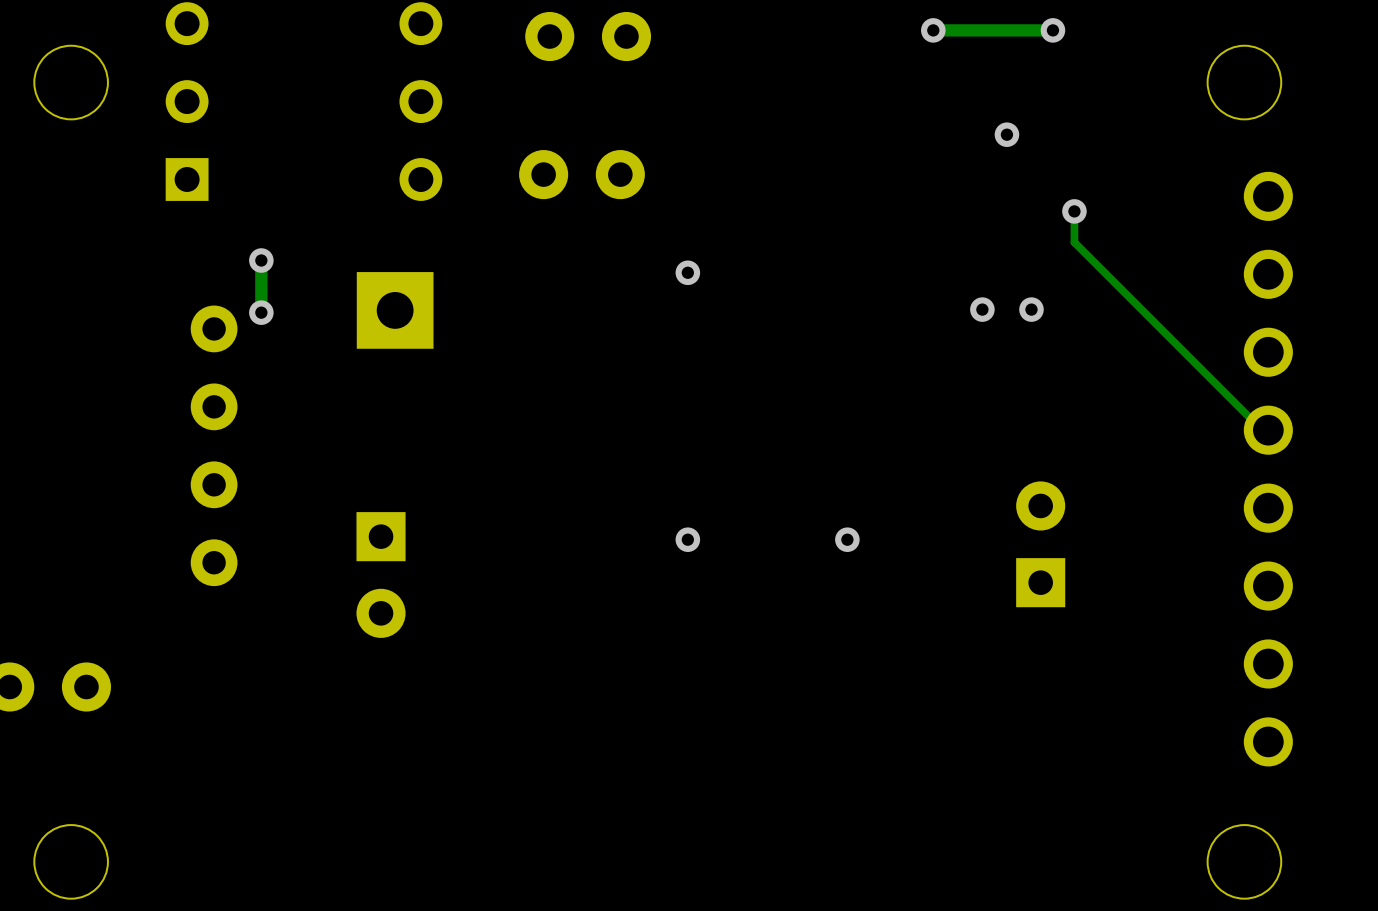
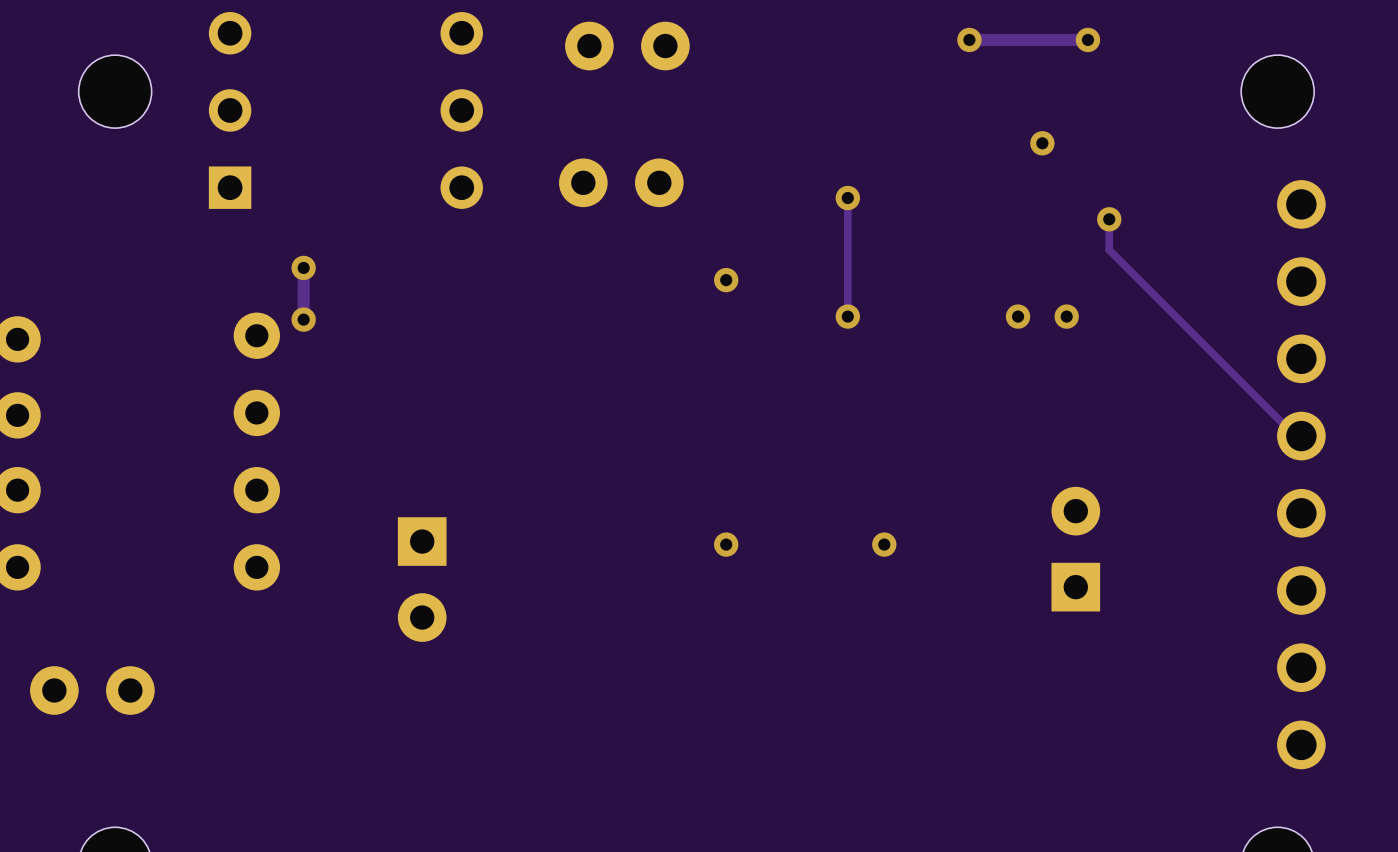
track: none -> (847, 198) (847, 316)
via: none -> (847, 198)
via: none -> (847, 316)
part: (395, 310) -> none

